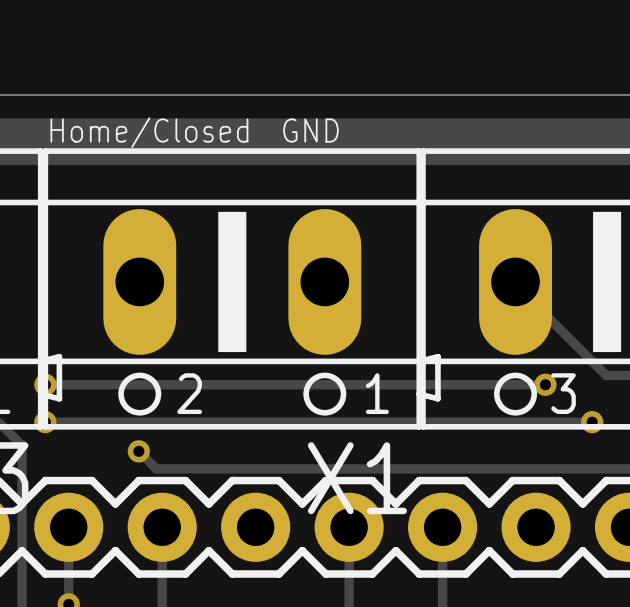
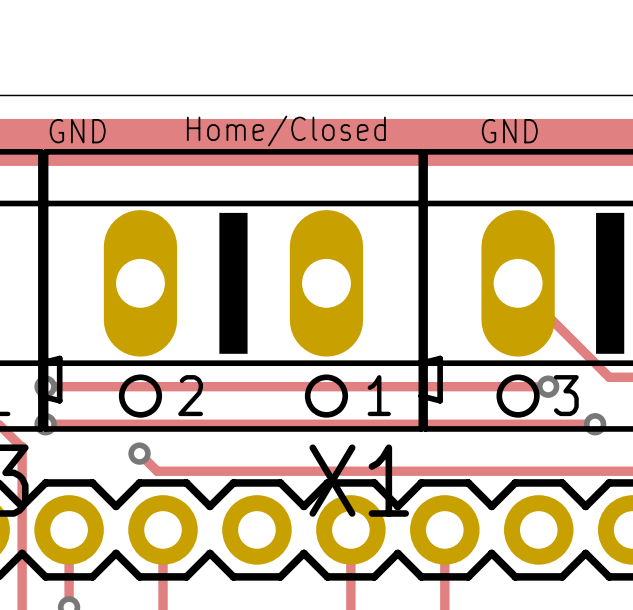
text: none -> Home/Closed (286, 130)
text position: GND (310, 130) -> GND (509, 131)
text: Home/Closed (149, 132) -> GND (77, 131)

